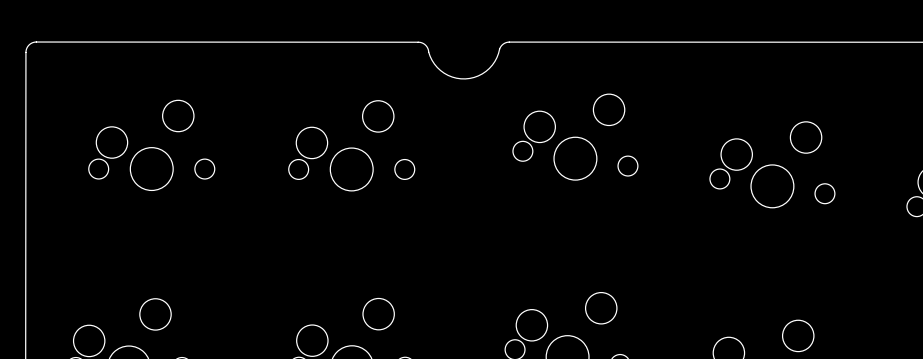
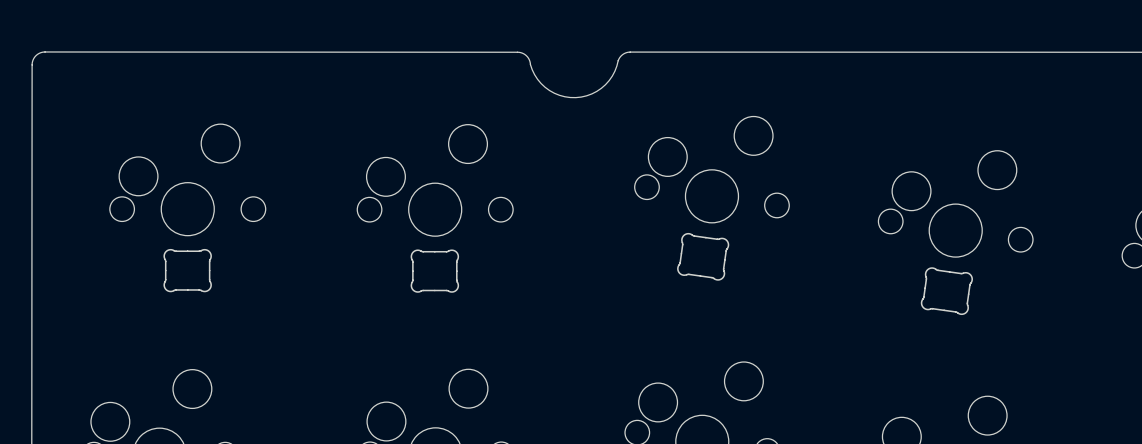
part: none -> (703, 256)
part: none -> (187, 270)
part: none -> (434, 271)
part: none -> (946, 291)

